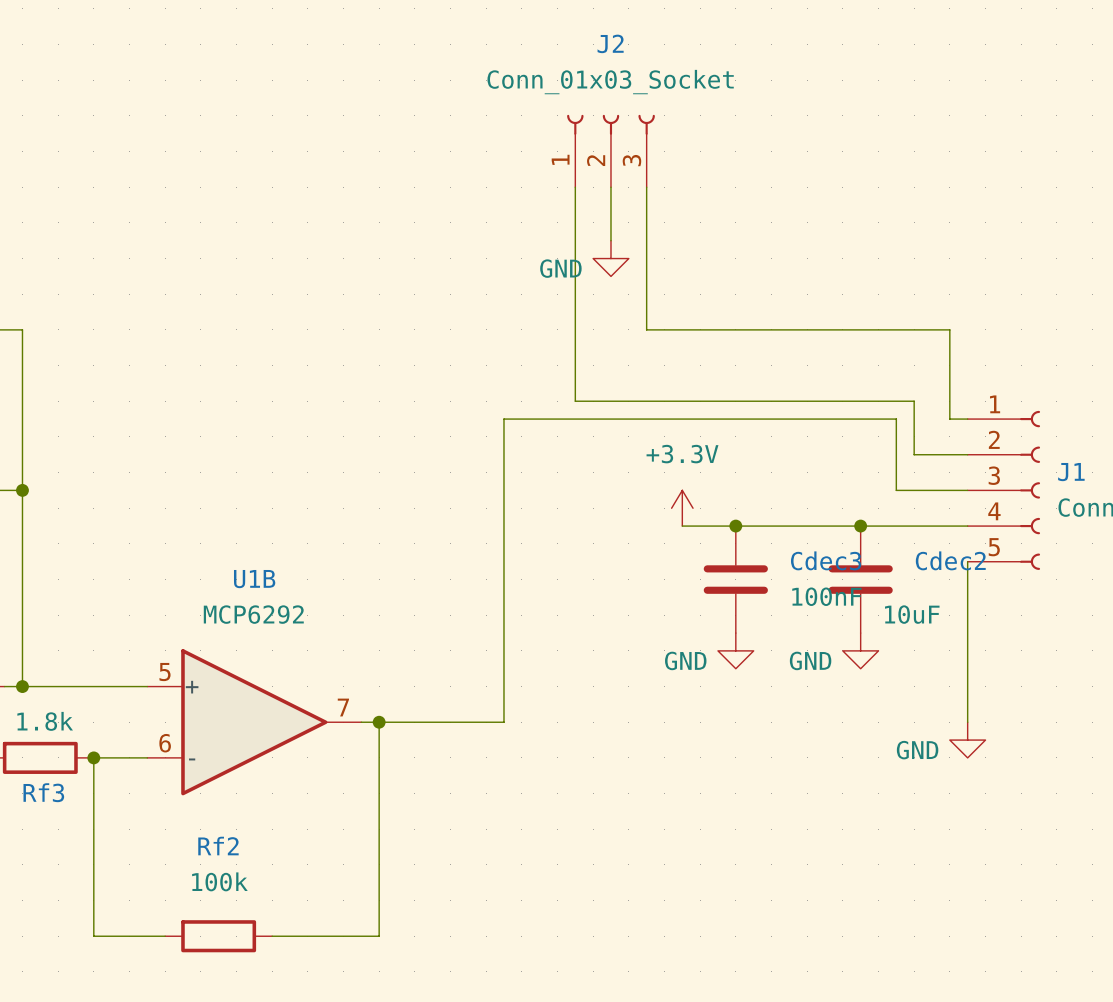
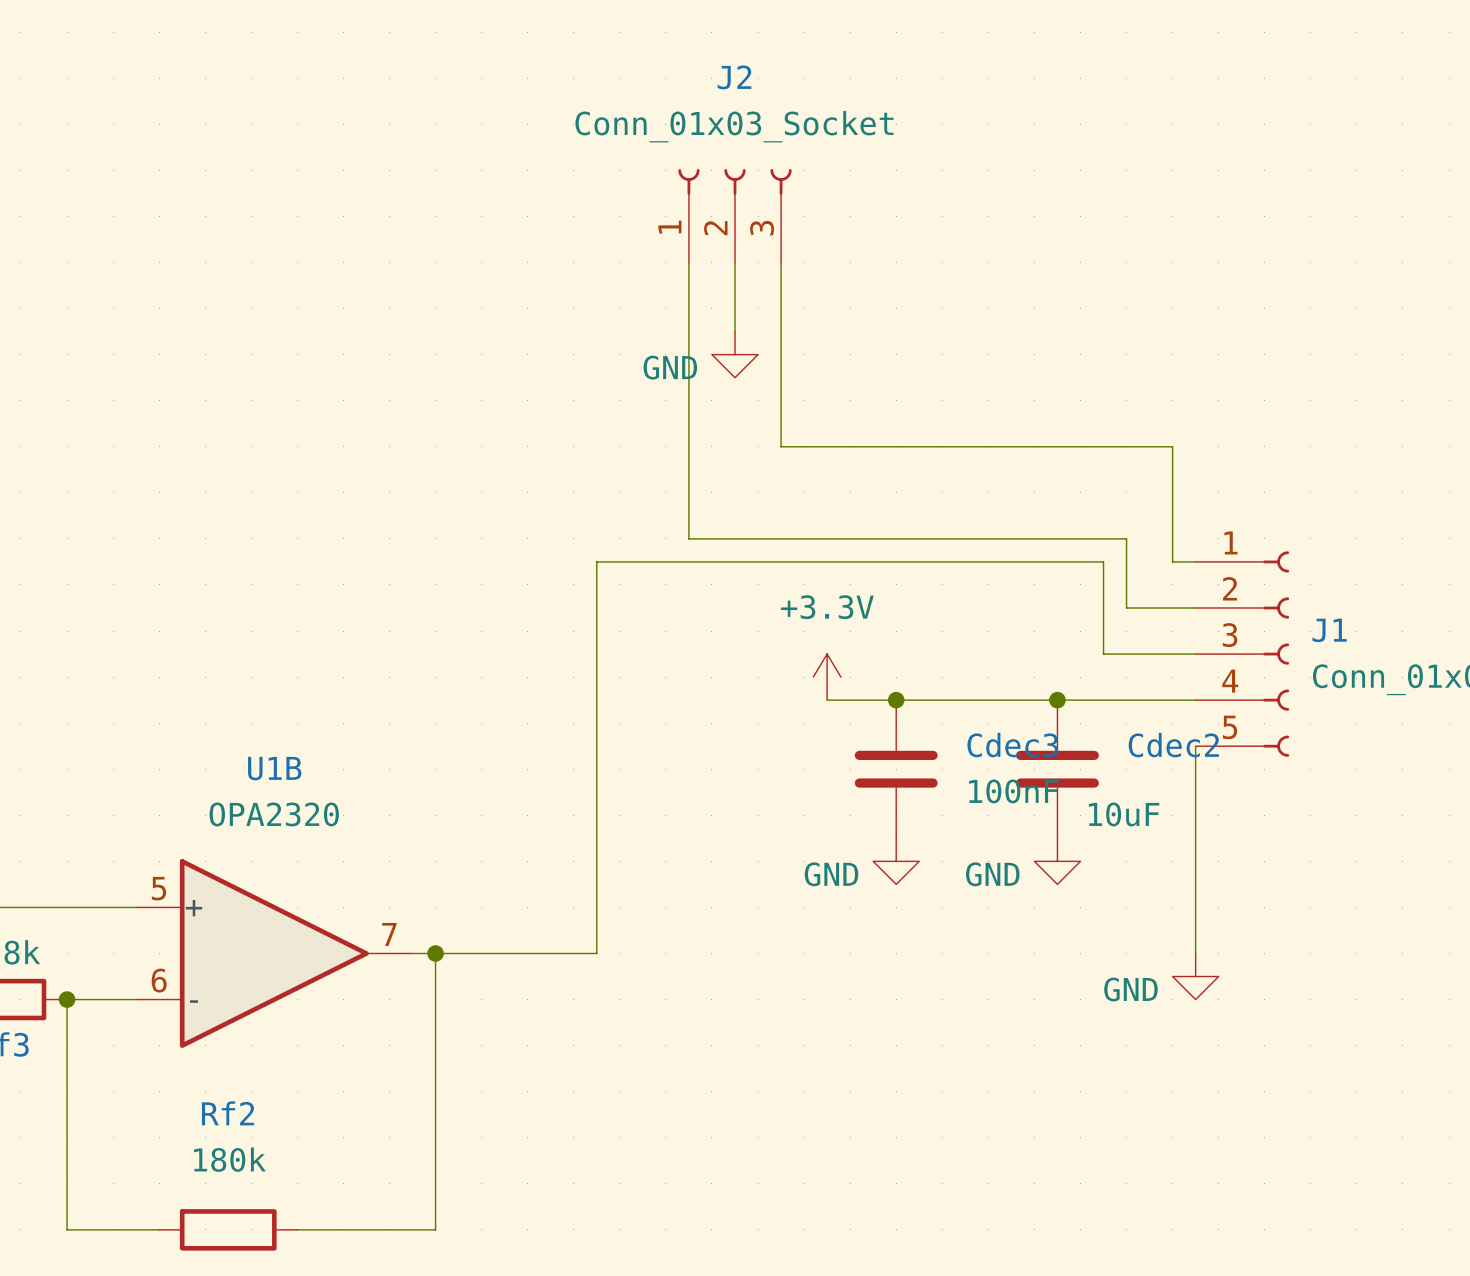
U1B value: MCP6292 (253, 614) -> OPA2320 (274, 814)
Rf2 value: 100k (219, 881) -> 180k (229, 1159)

